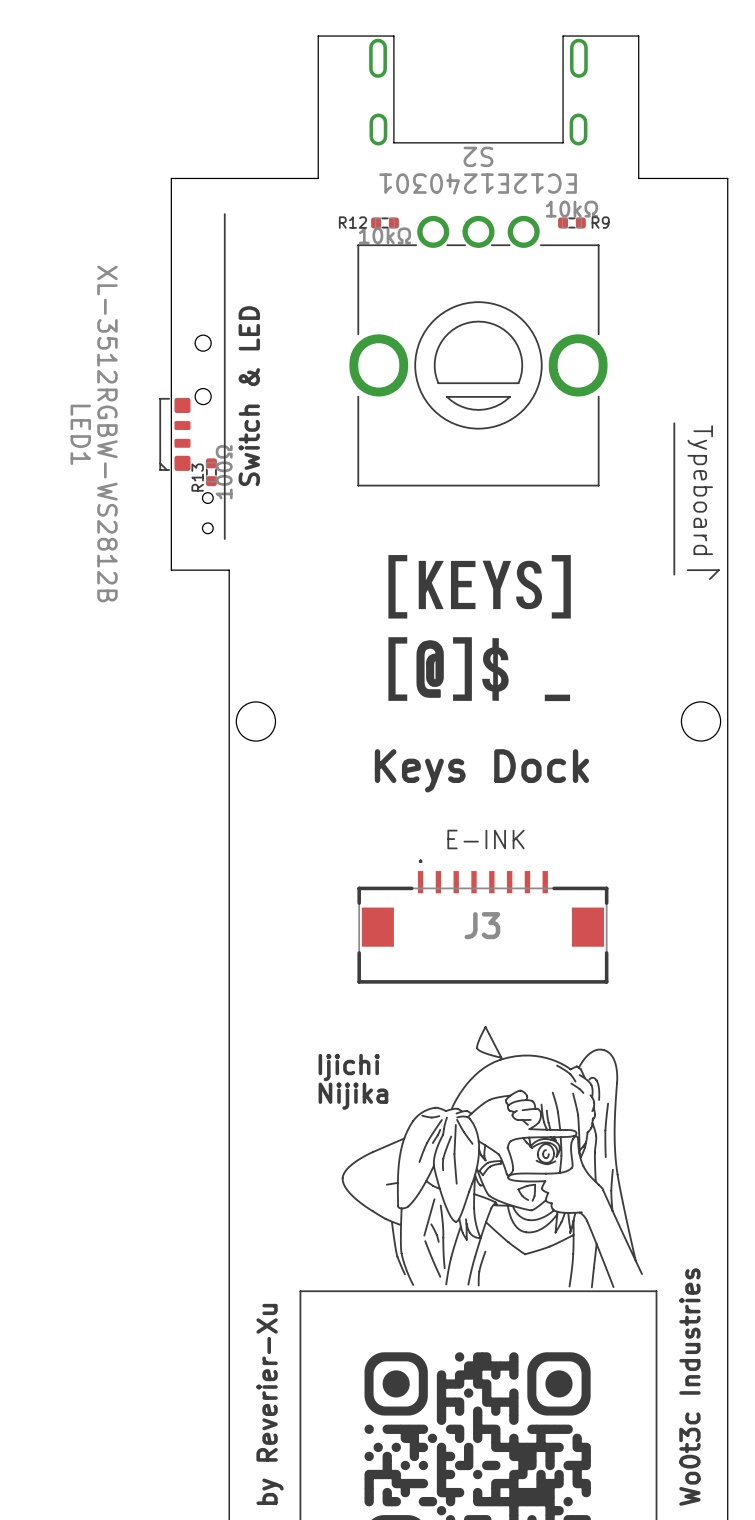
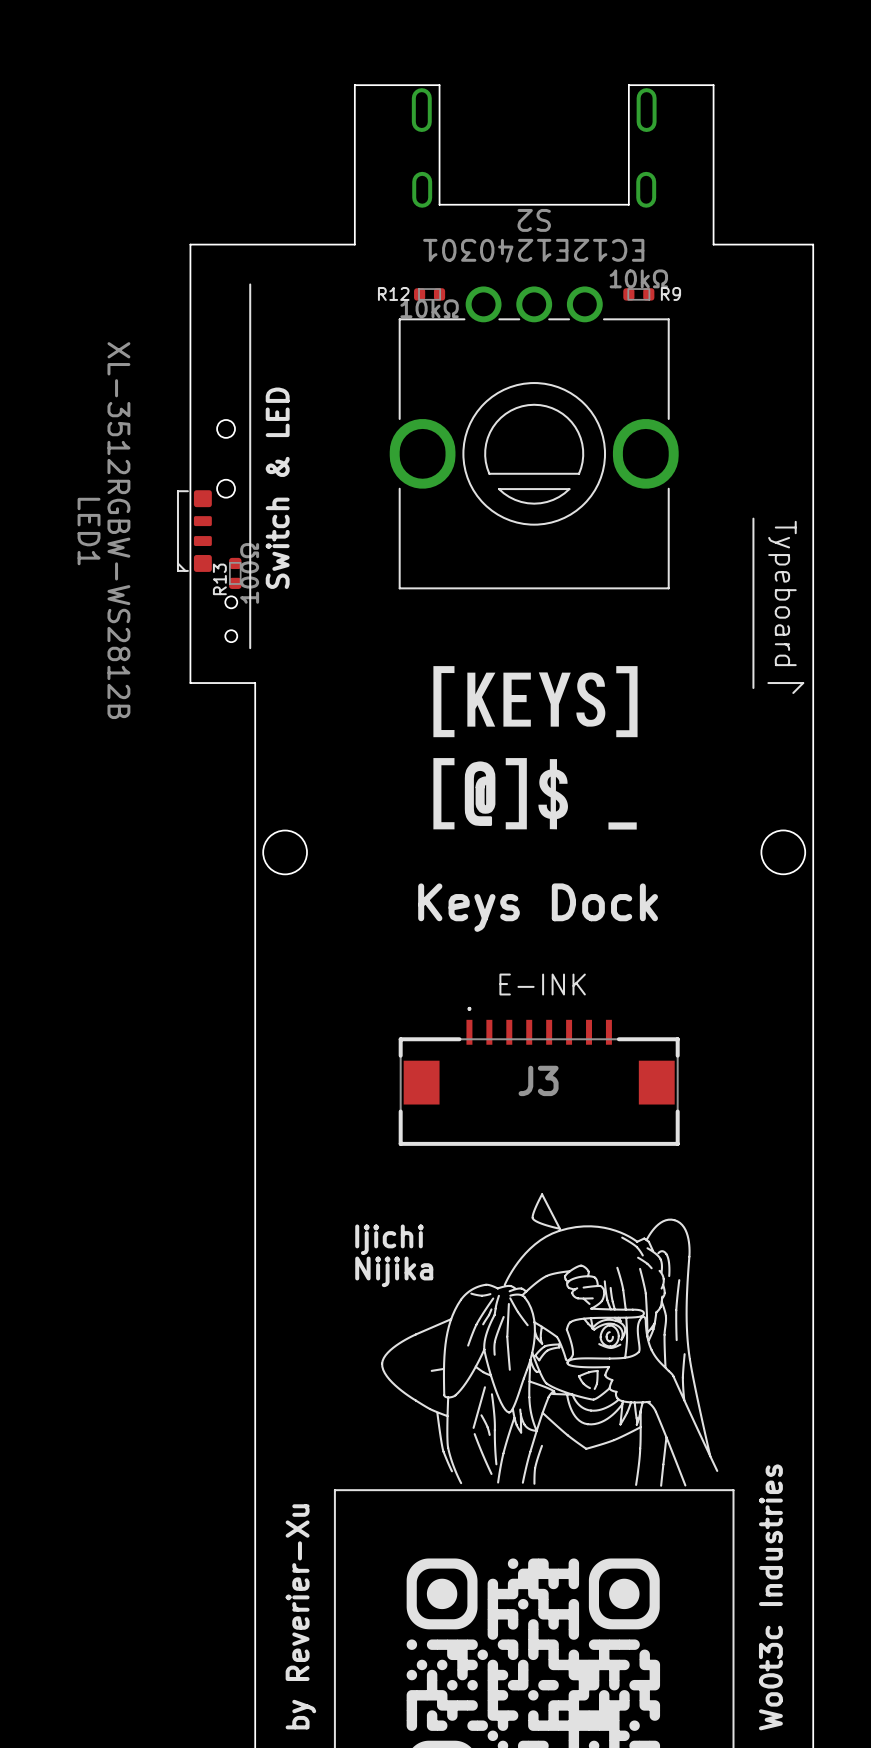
R12 footprint: [371, 217, 399, 229] -> [414, 288, 446, 301]
R9 footprint: [558, 217, 586, 229] -> [623, 288, 655, 301]
R13 footprint: [205, 458, 217, 487] -> [229, 557, 242, 589]

